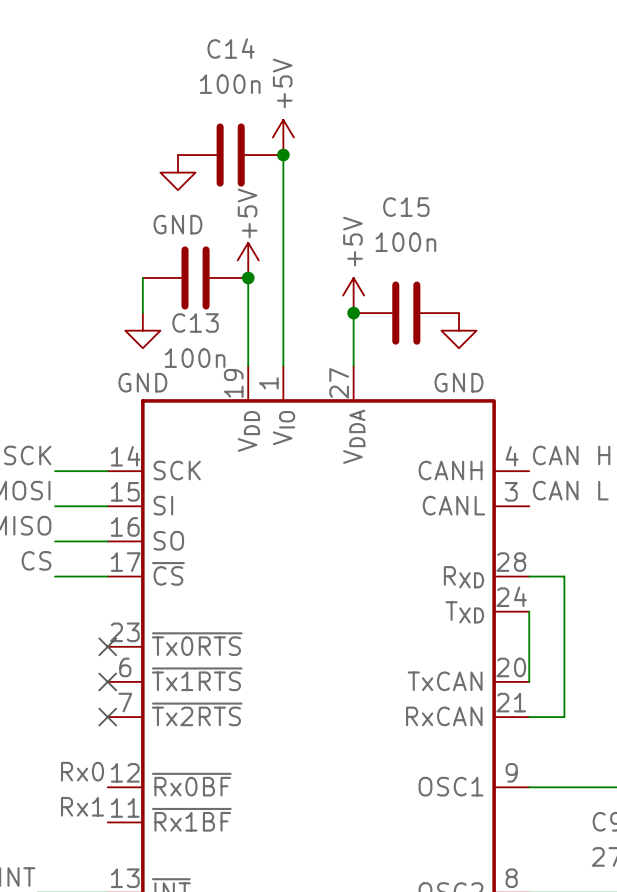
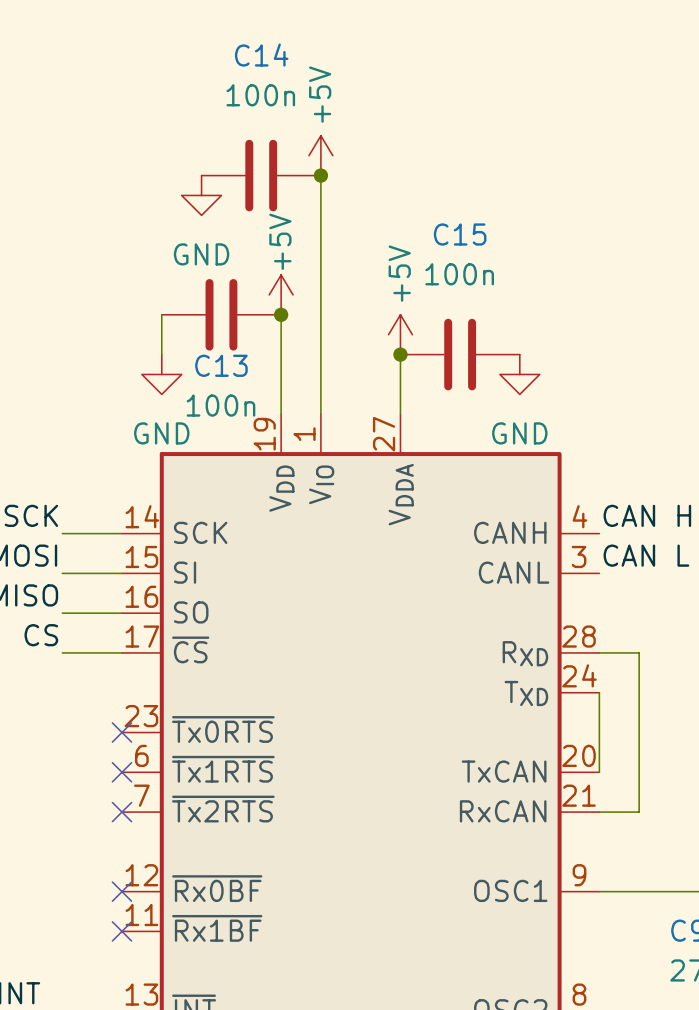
label: Rx0 (82, 771) -> none
no-connect mark: none -> (122, 891)
label: Rx1 (82, 806) -> none
no-connect mark: none -> (122, 931)

